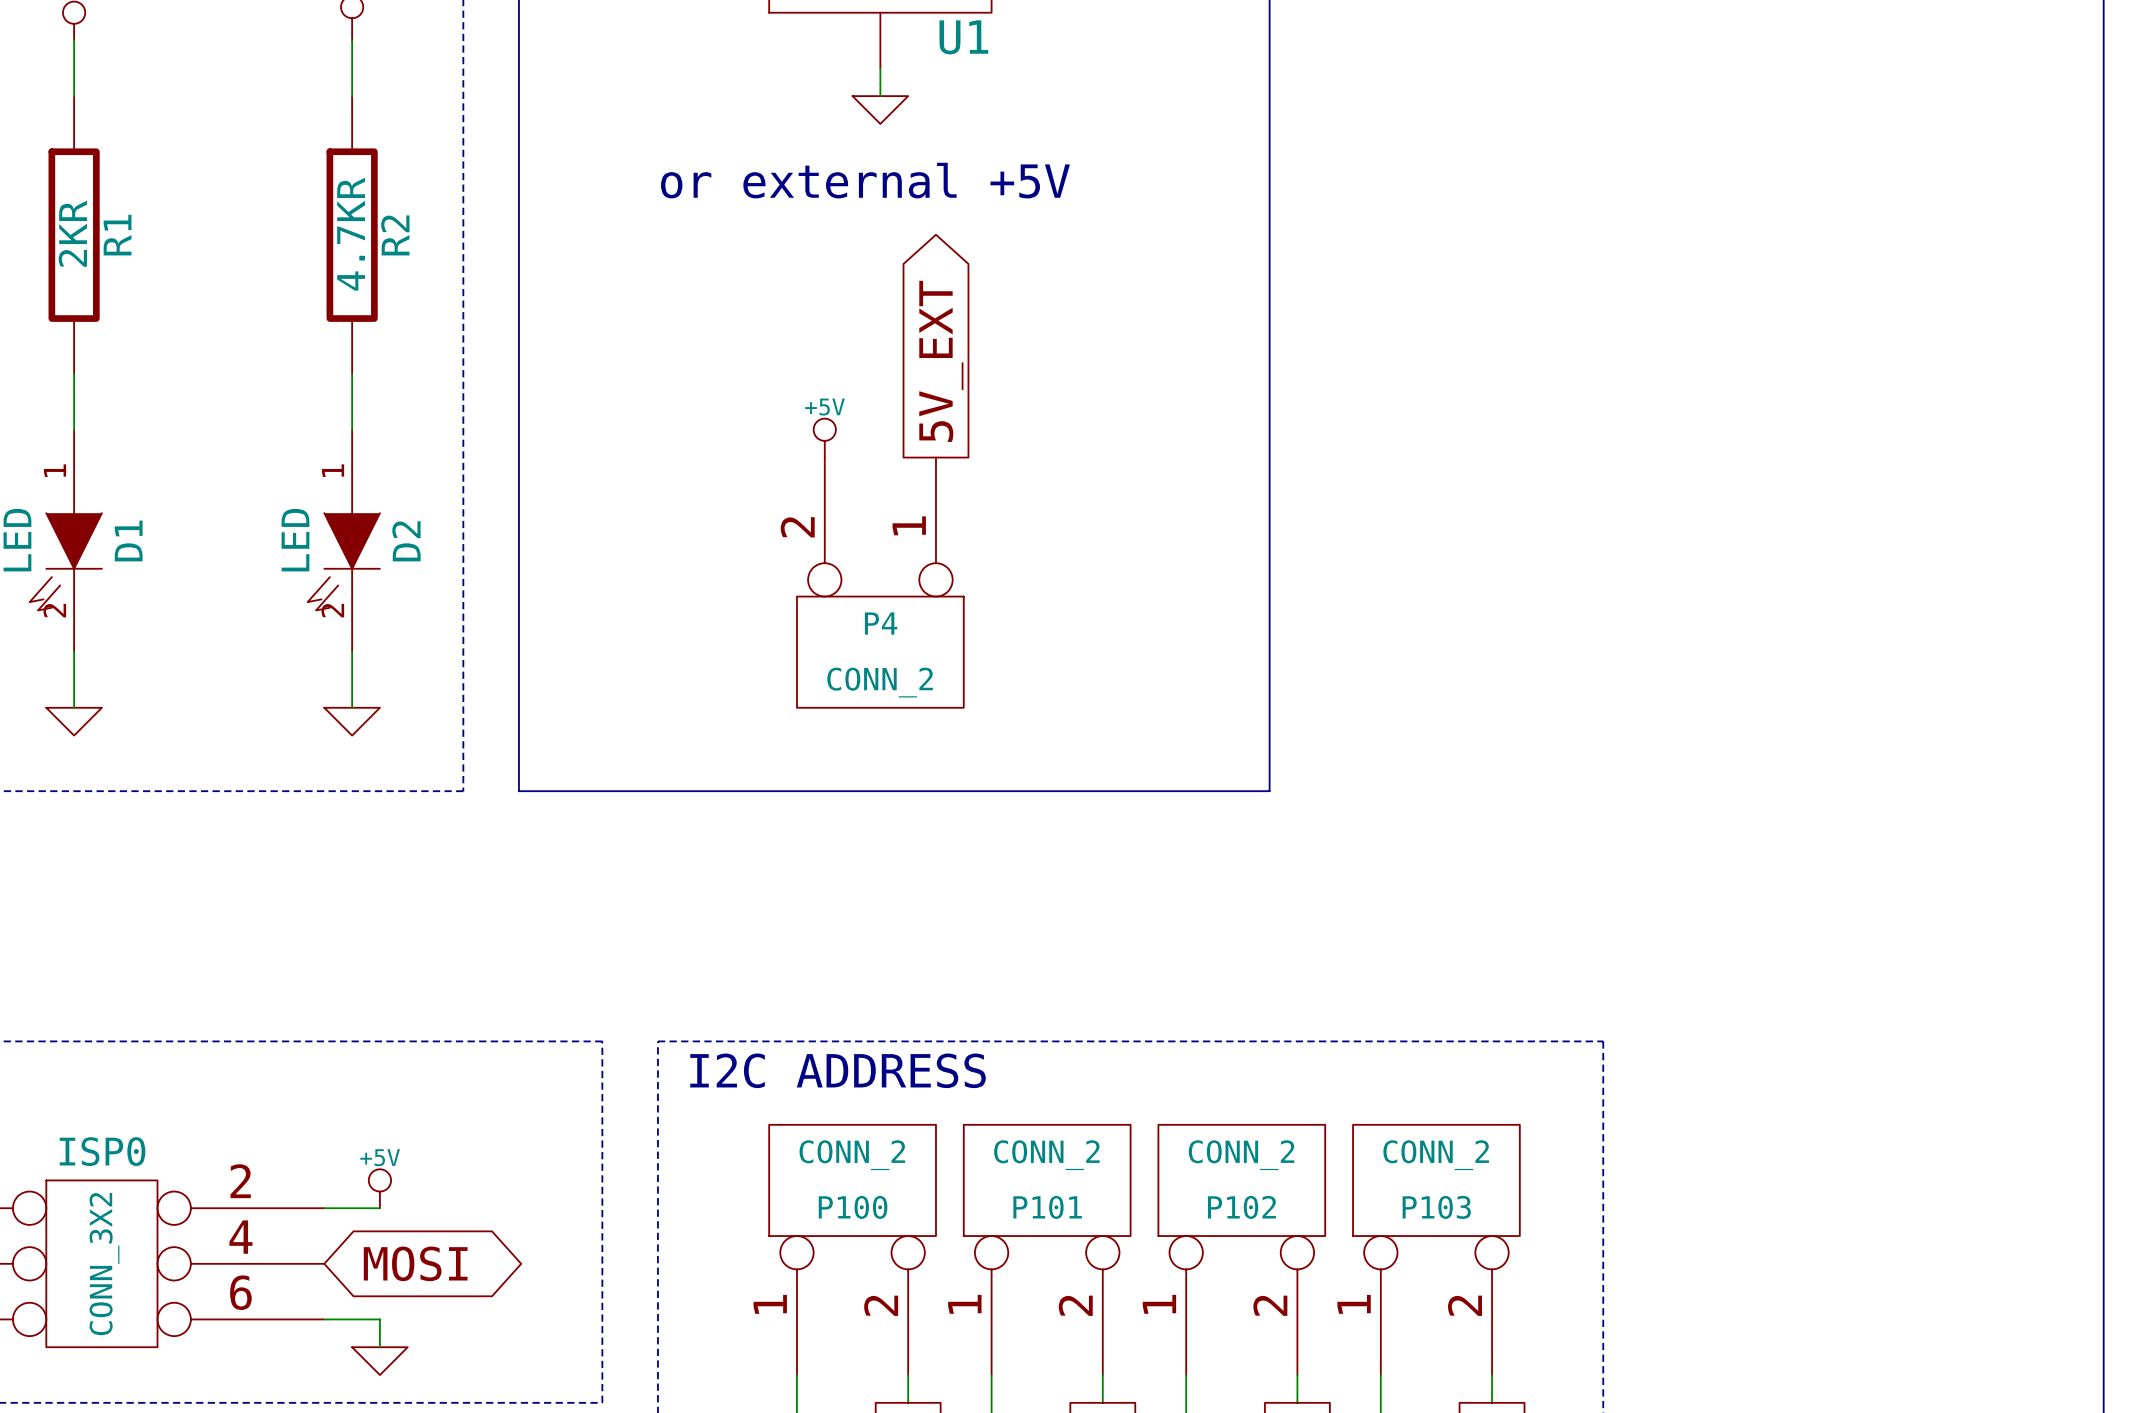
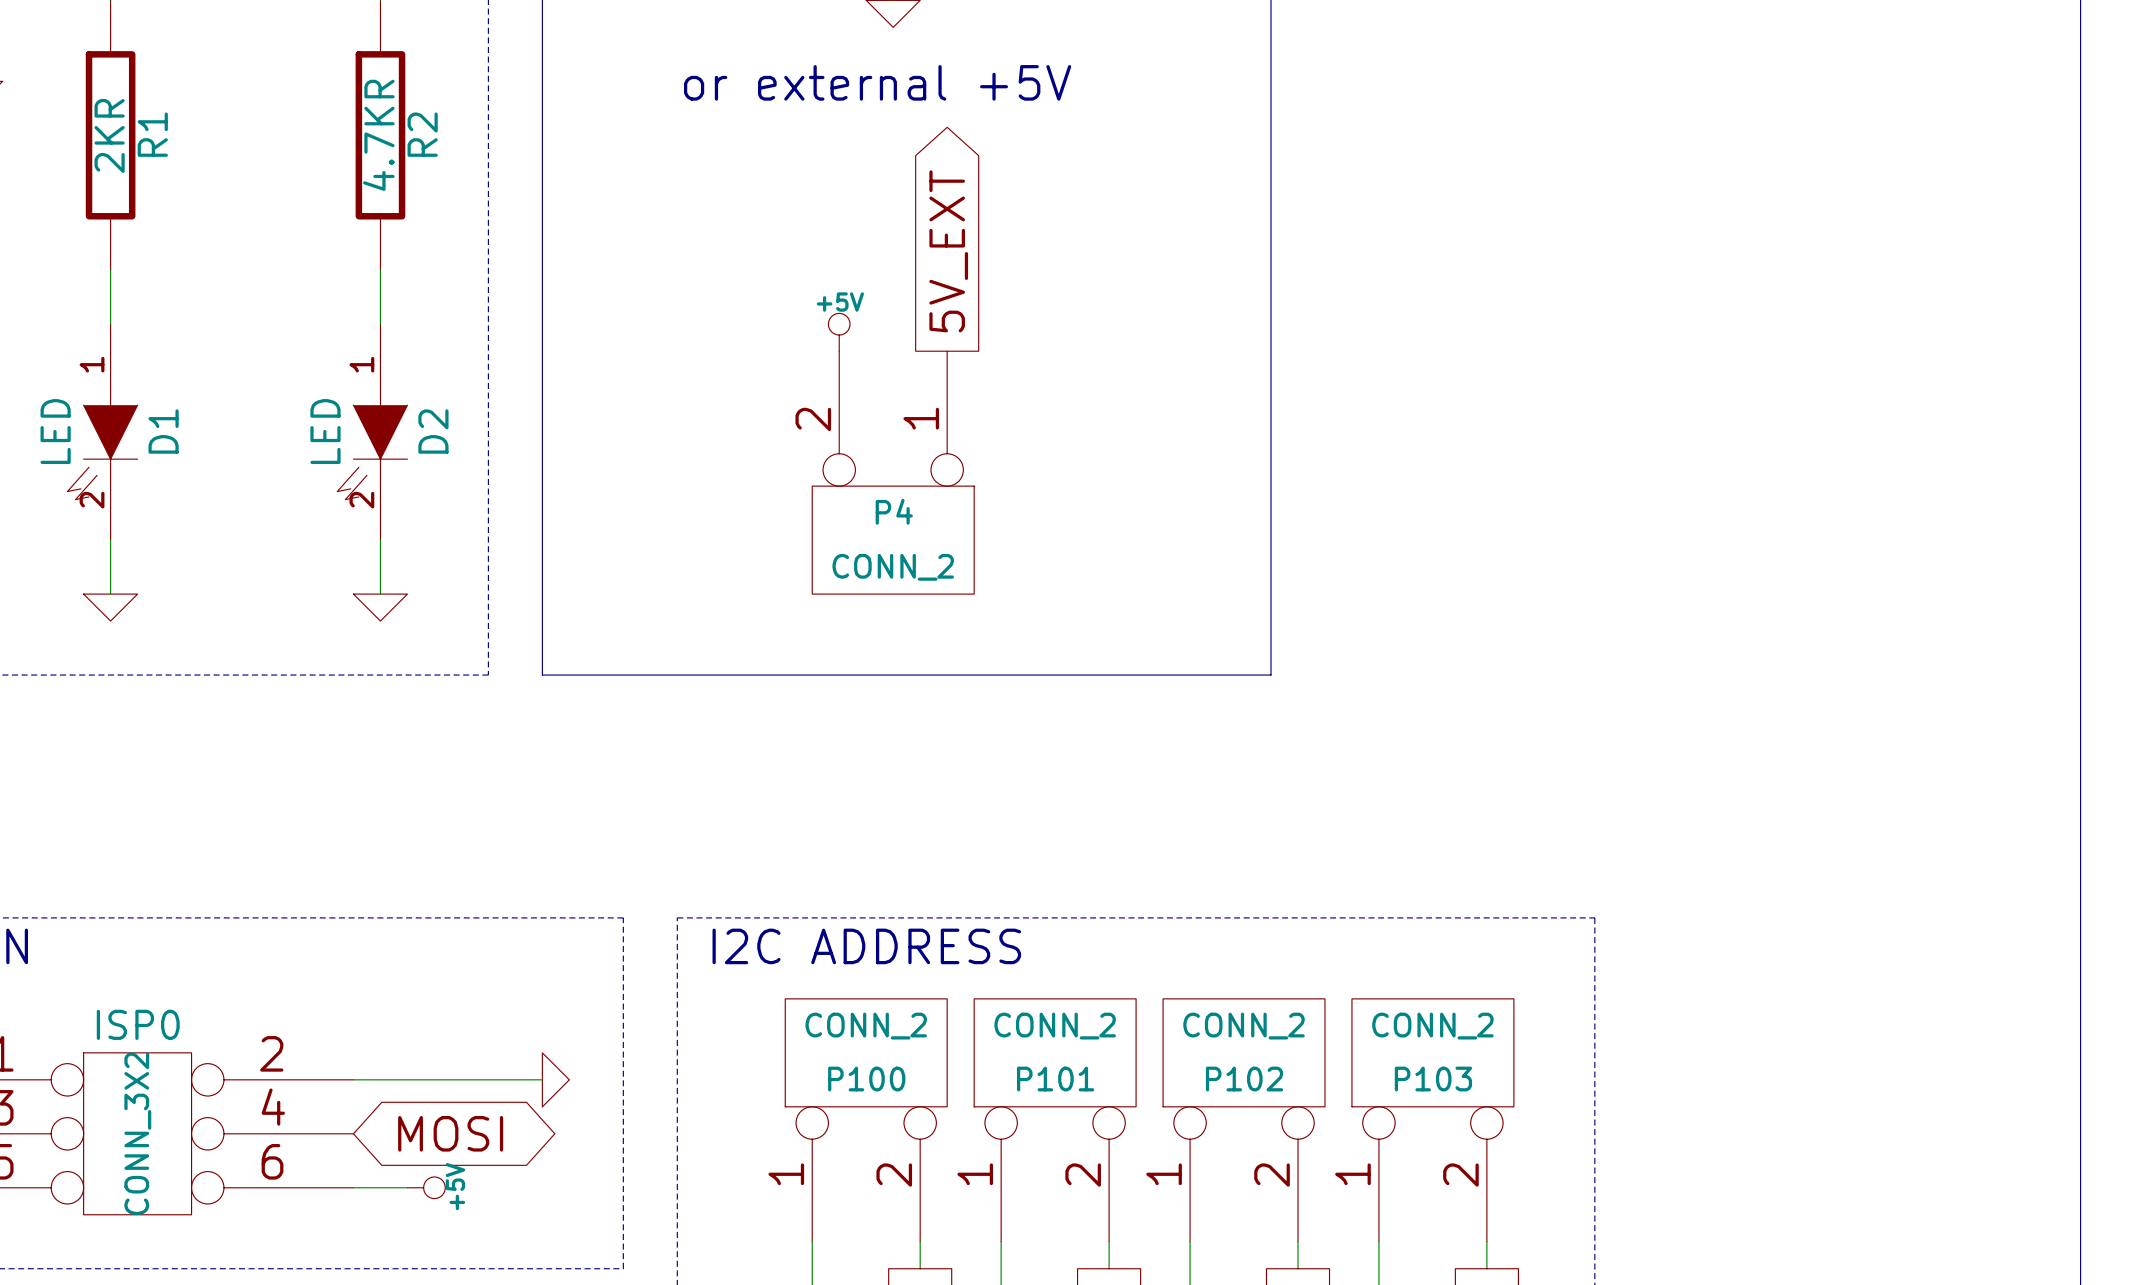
power symbol rotation: 0° (379, 1188) -> 90° clockwise (426, 1187)
power symbol position: +5V (379, 1188) -> +5V (426, 1187)
wire: none -> (407, 1079) (542, 1079)
wire: (379, 1319) (379, 1347) -> none
power symbol rotation: 0° (379, 1361) -> 90° counterclockwise (555, 1079)
power symbol position: (379, 1361) -> (555, 1079)

